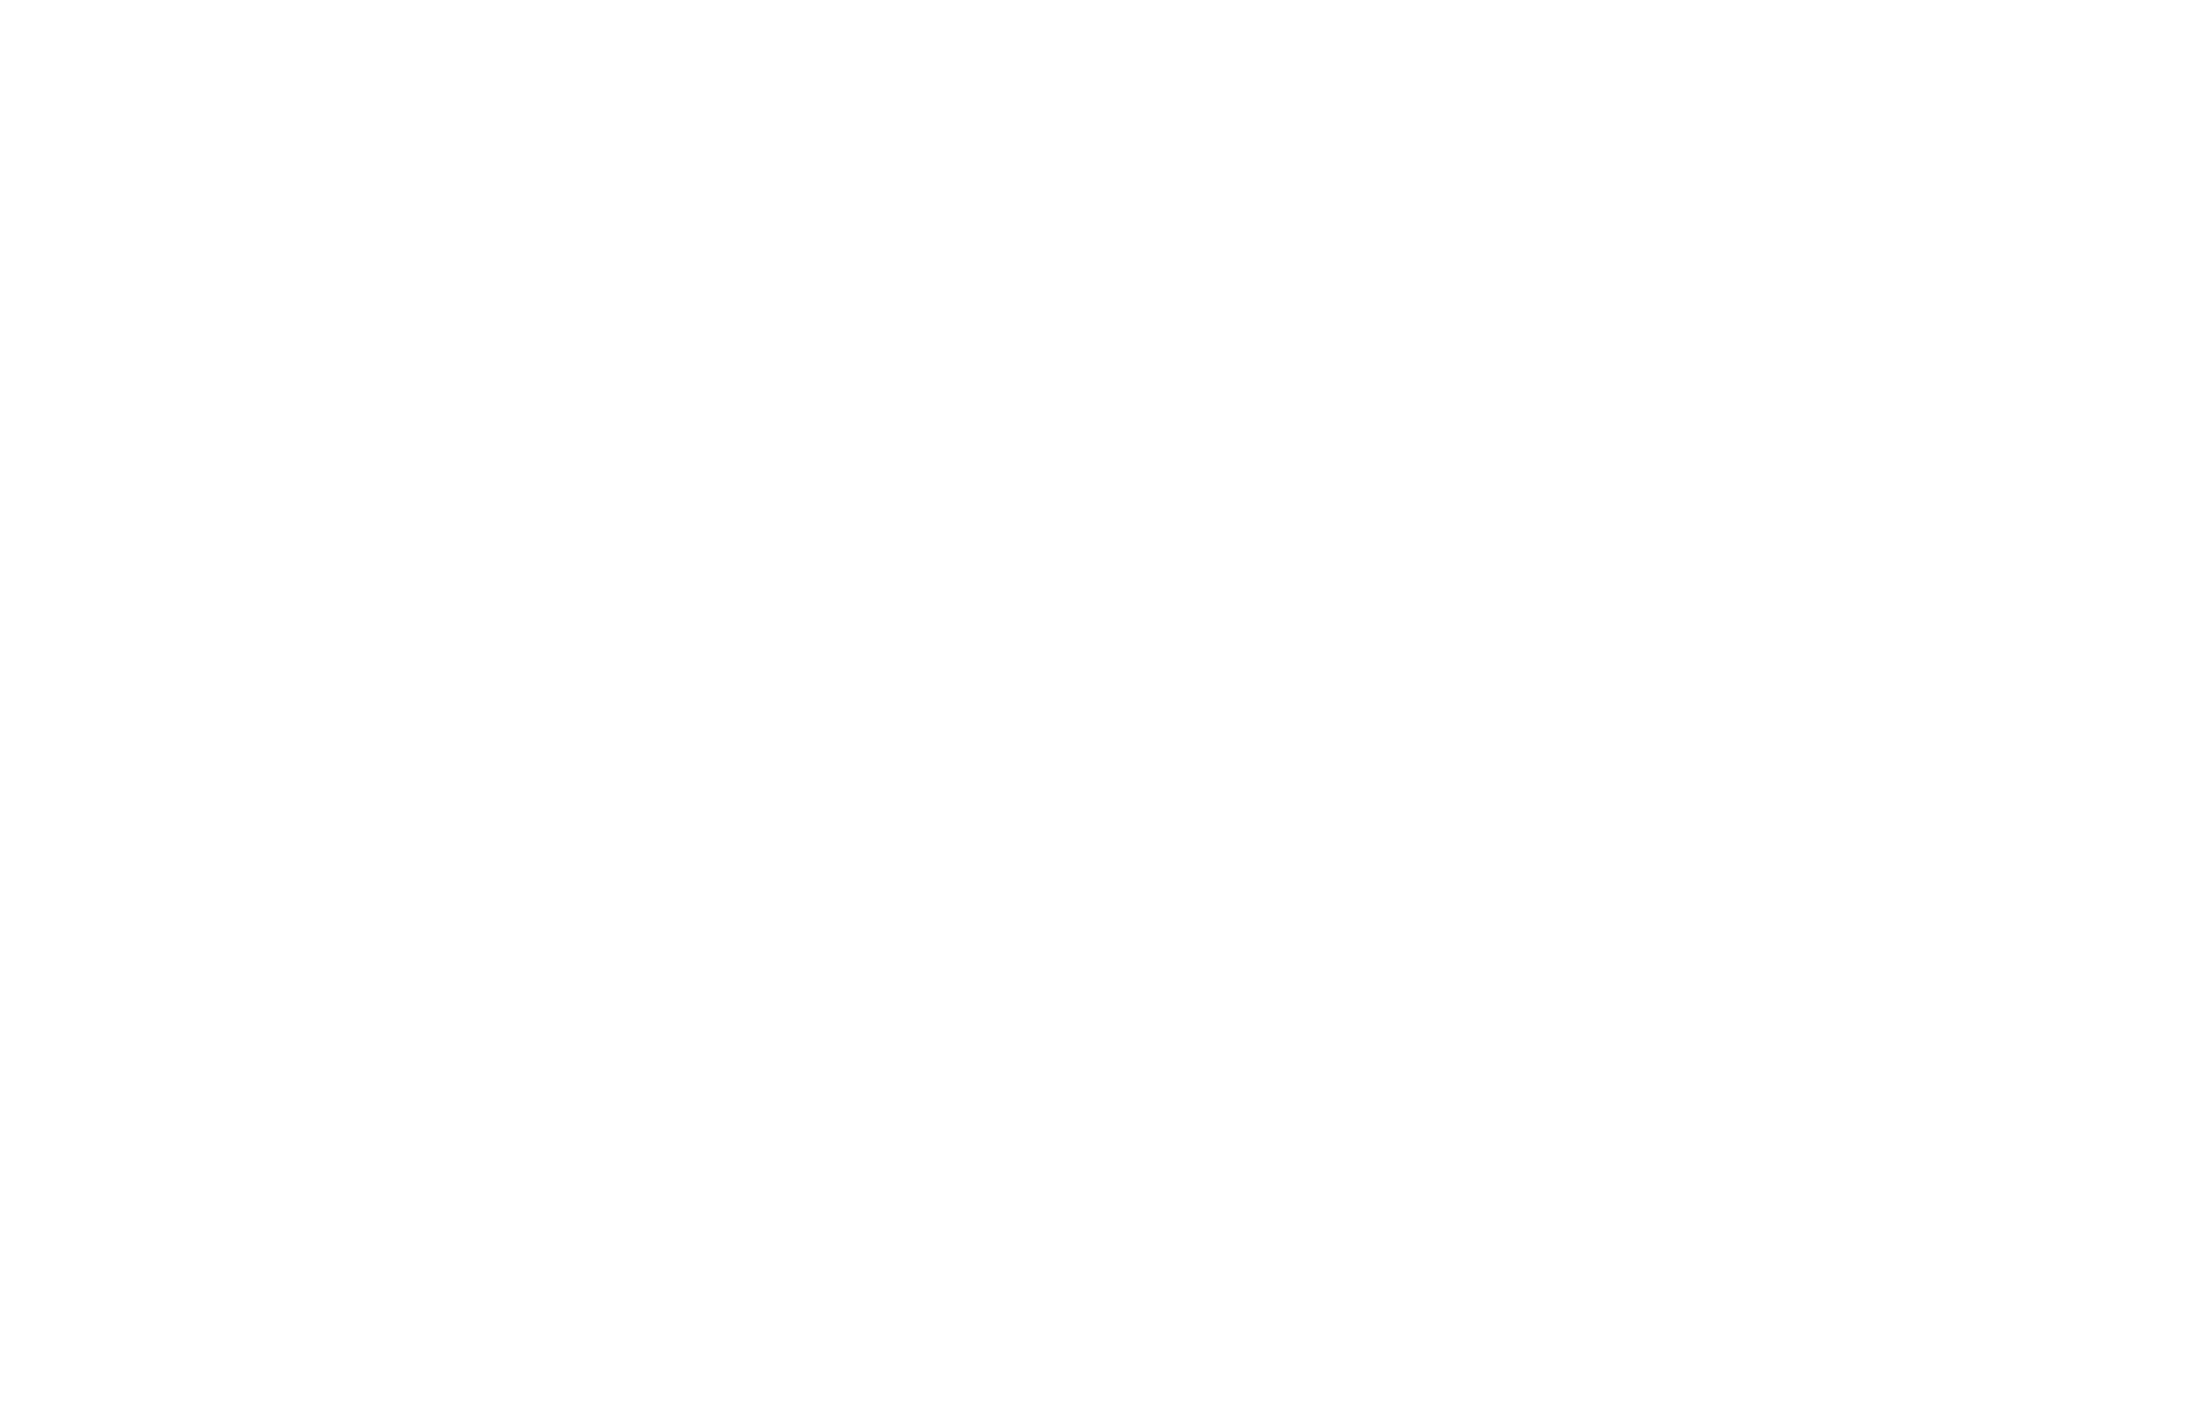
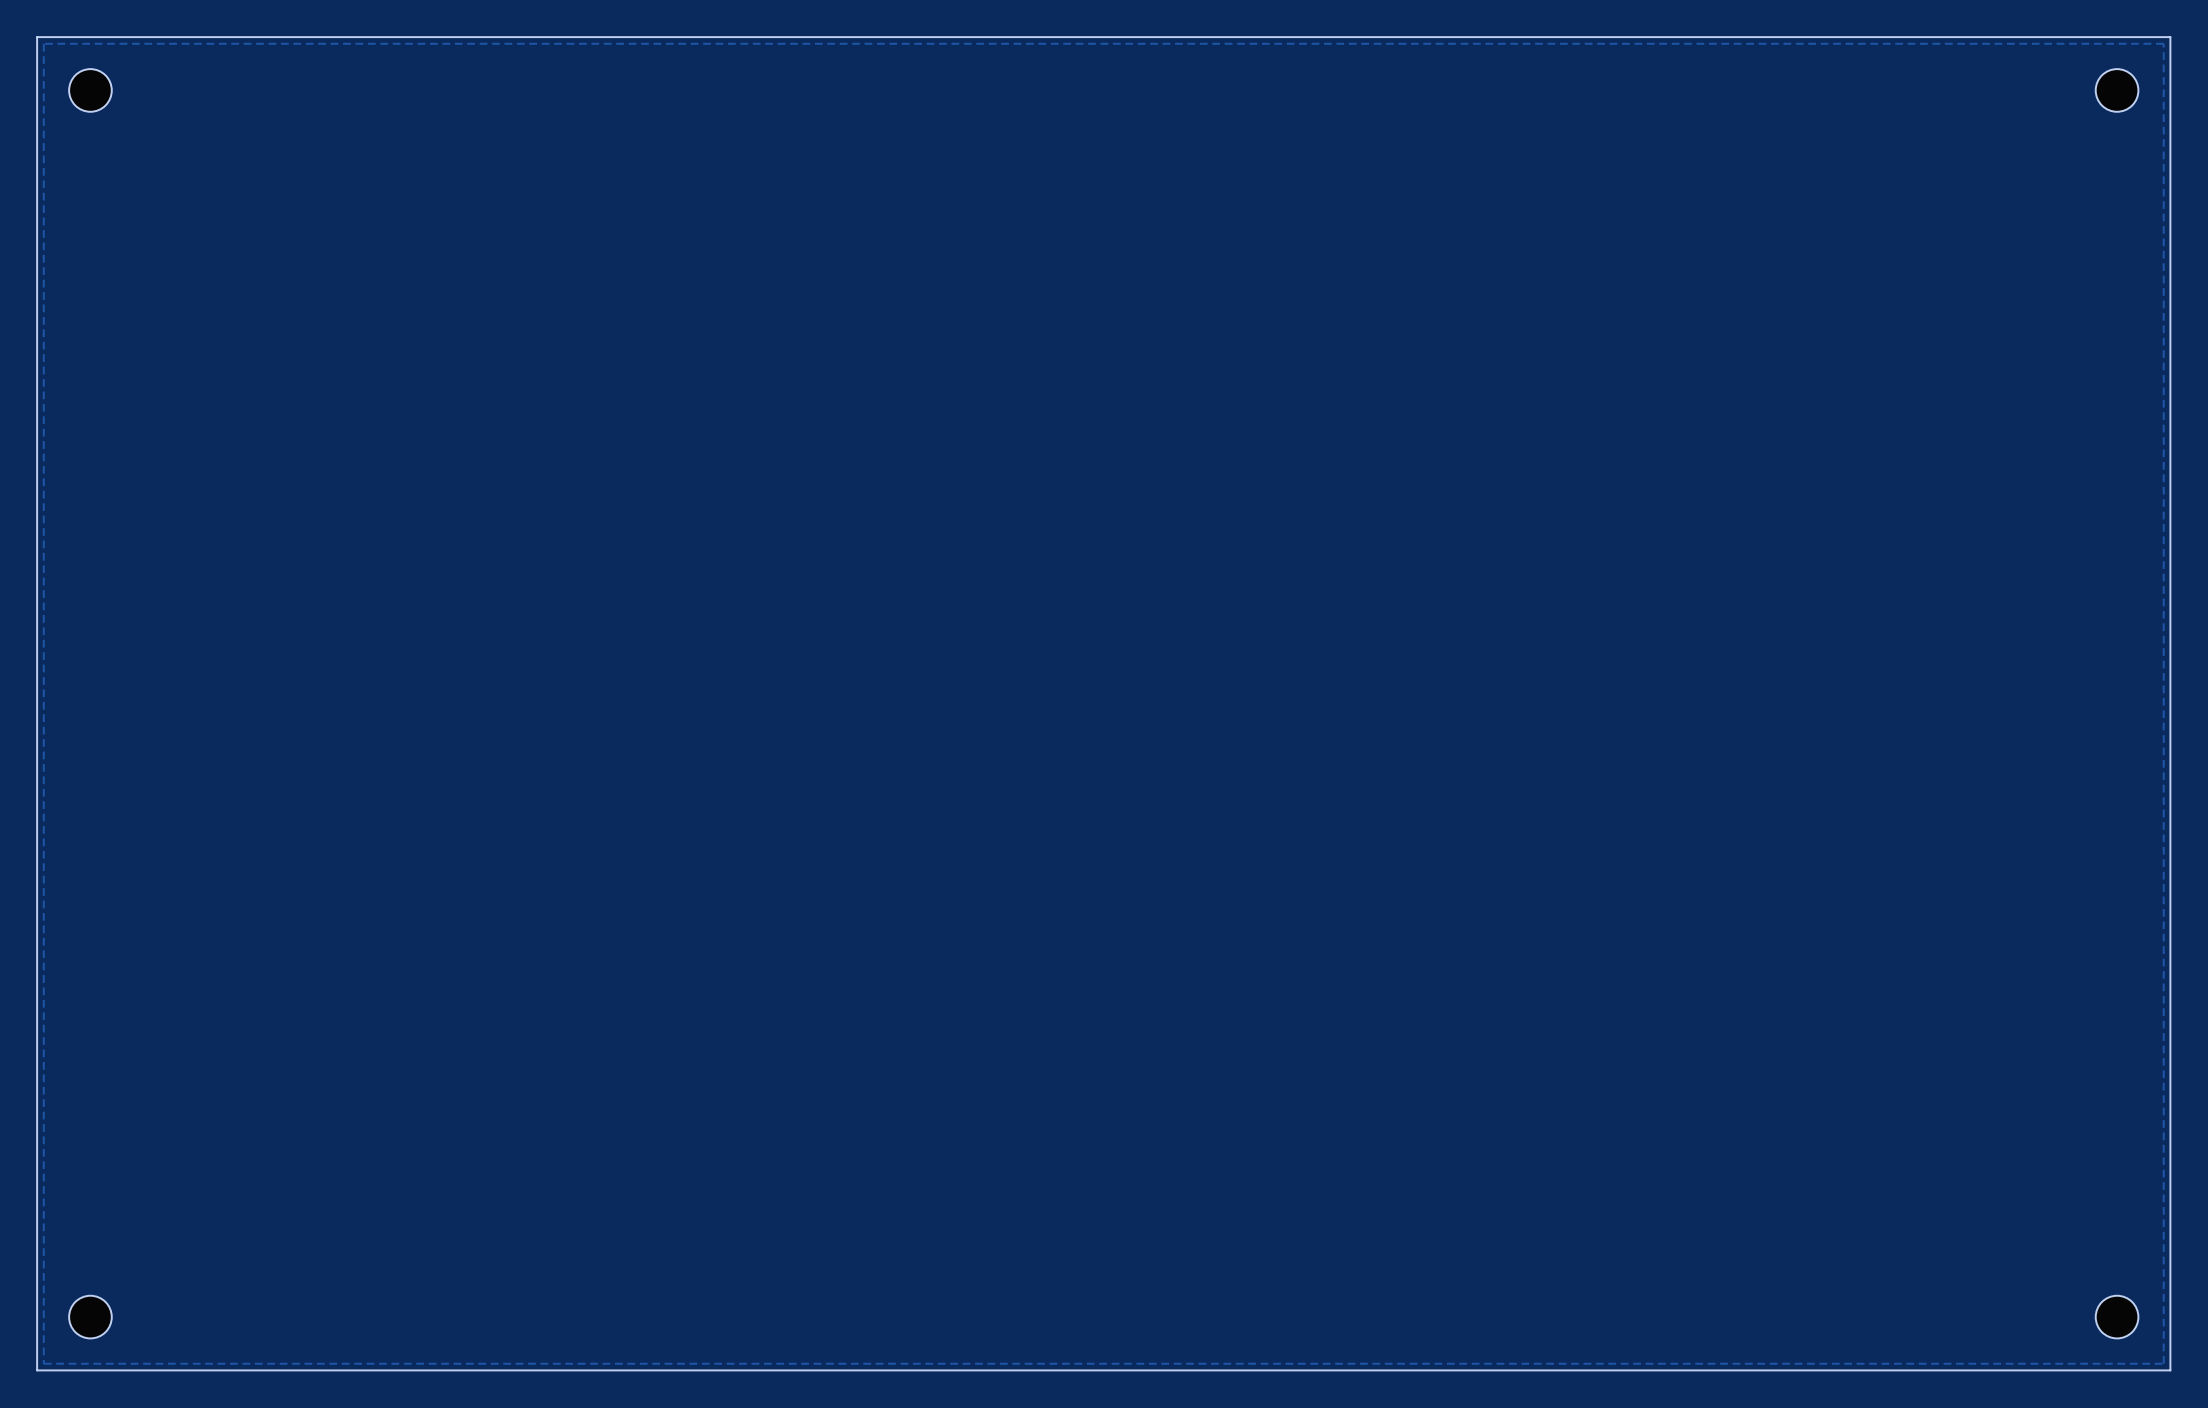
board edge: none -> (2170, 37) (37, 37) (37, 1370) (2170, 1370) (2170, 37)
zone outline: none -> (2163, 43) (43, 43) (43, 1363) (2163, 1363) (2163, 43)
part: none -> (90, 90)
part: none -> (2117, 90)
part: none -> (90, 1317)
part: none -> (2117, 1317)

